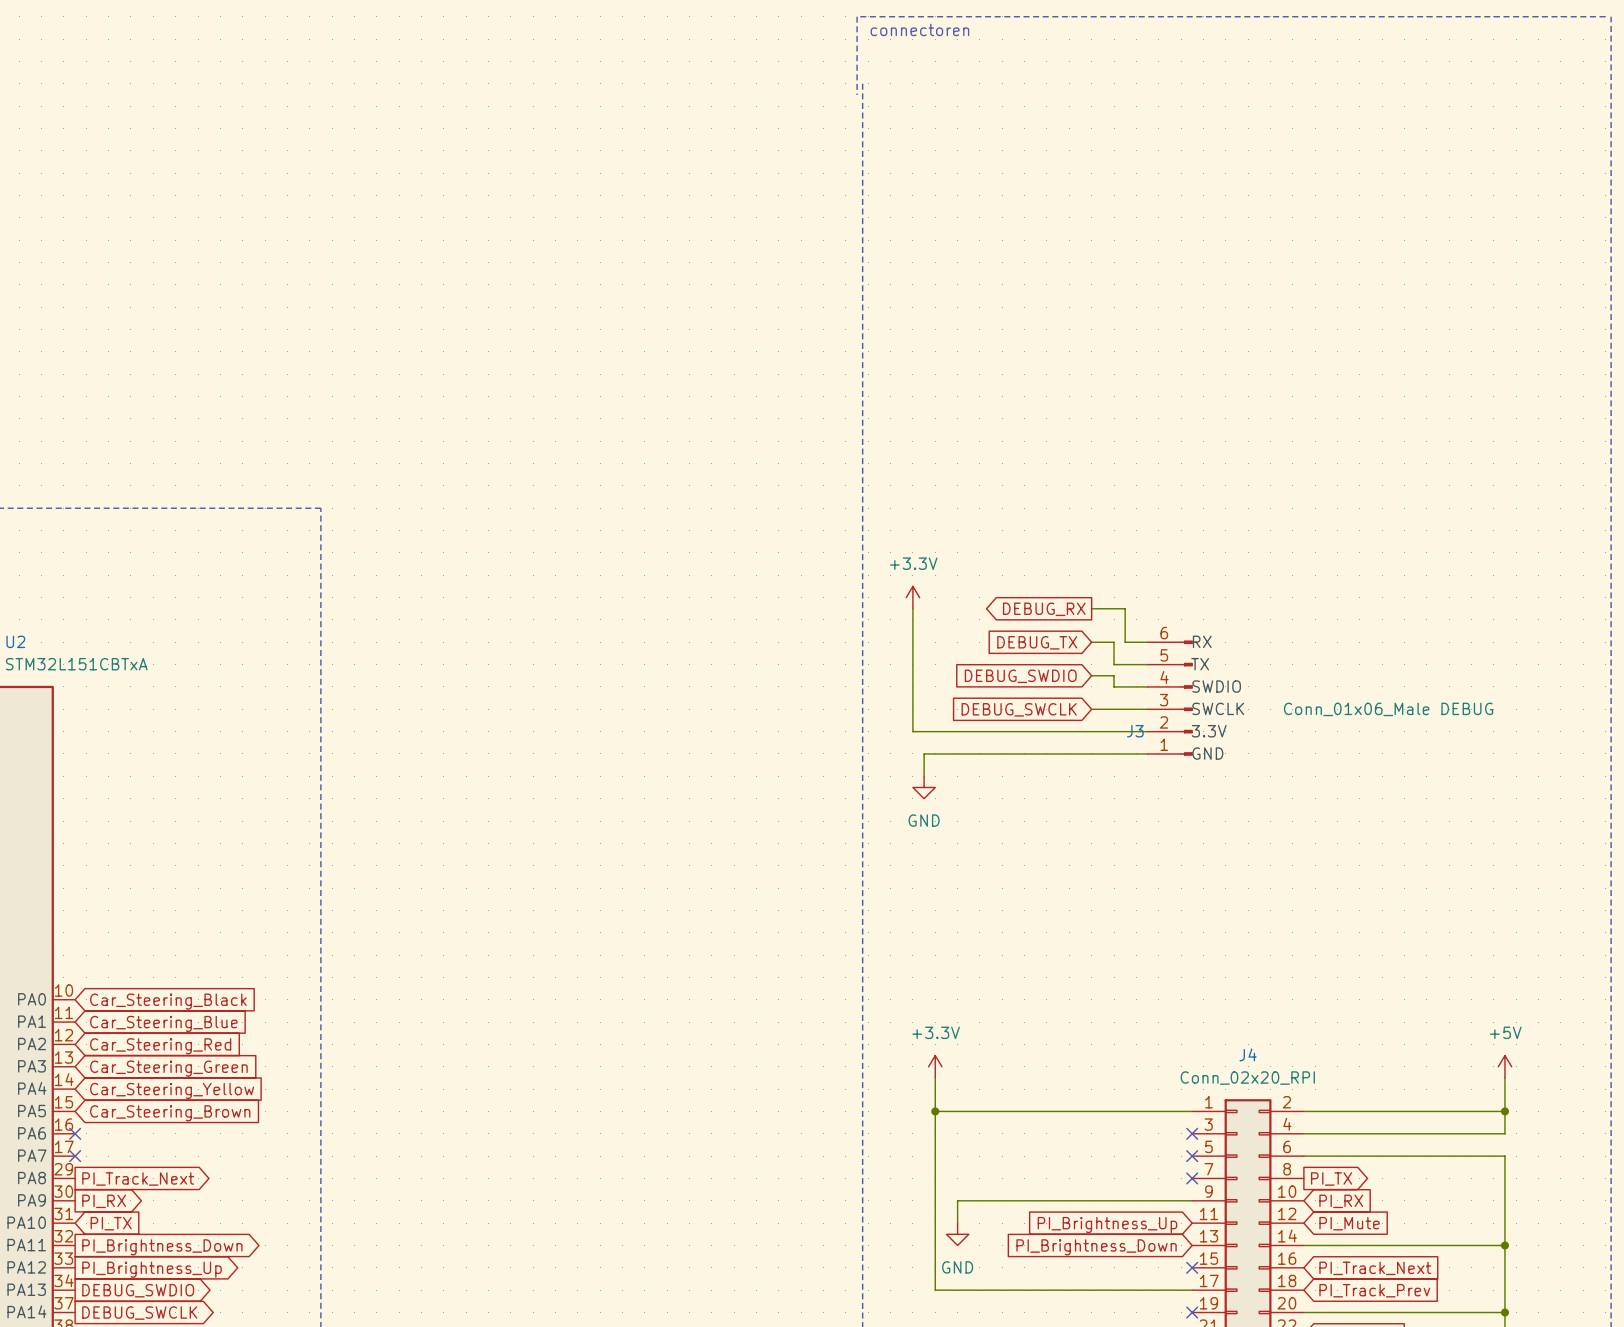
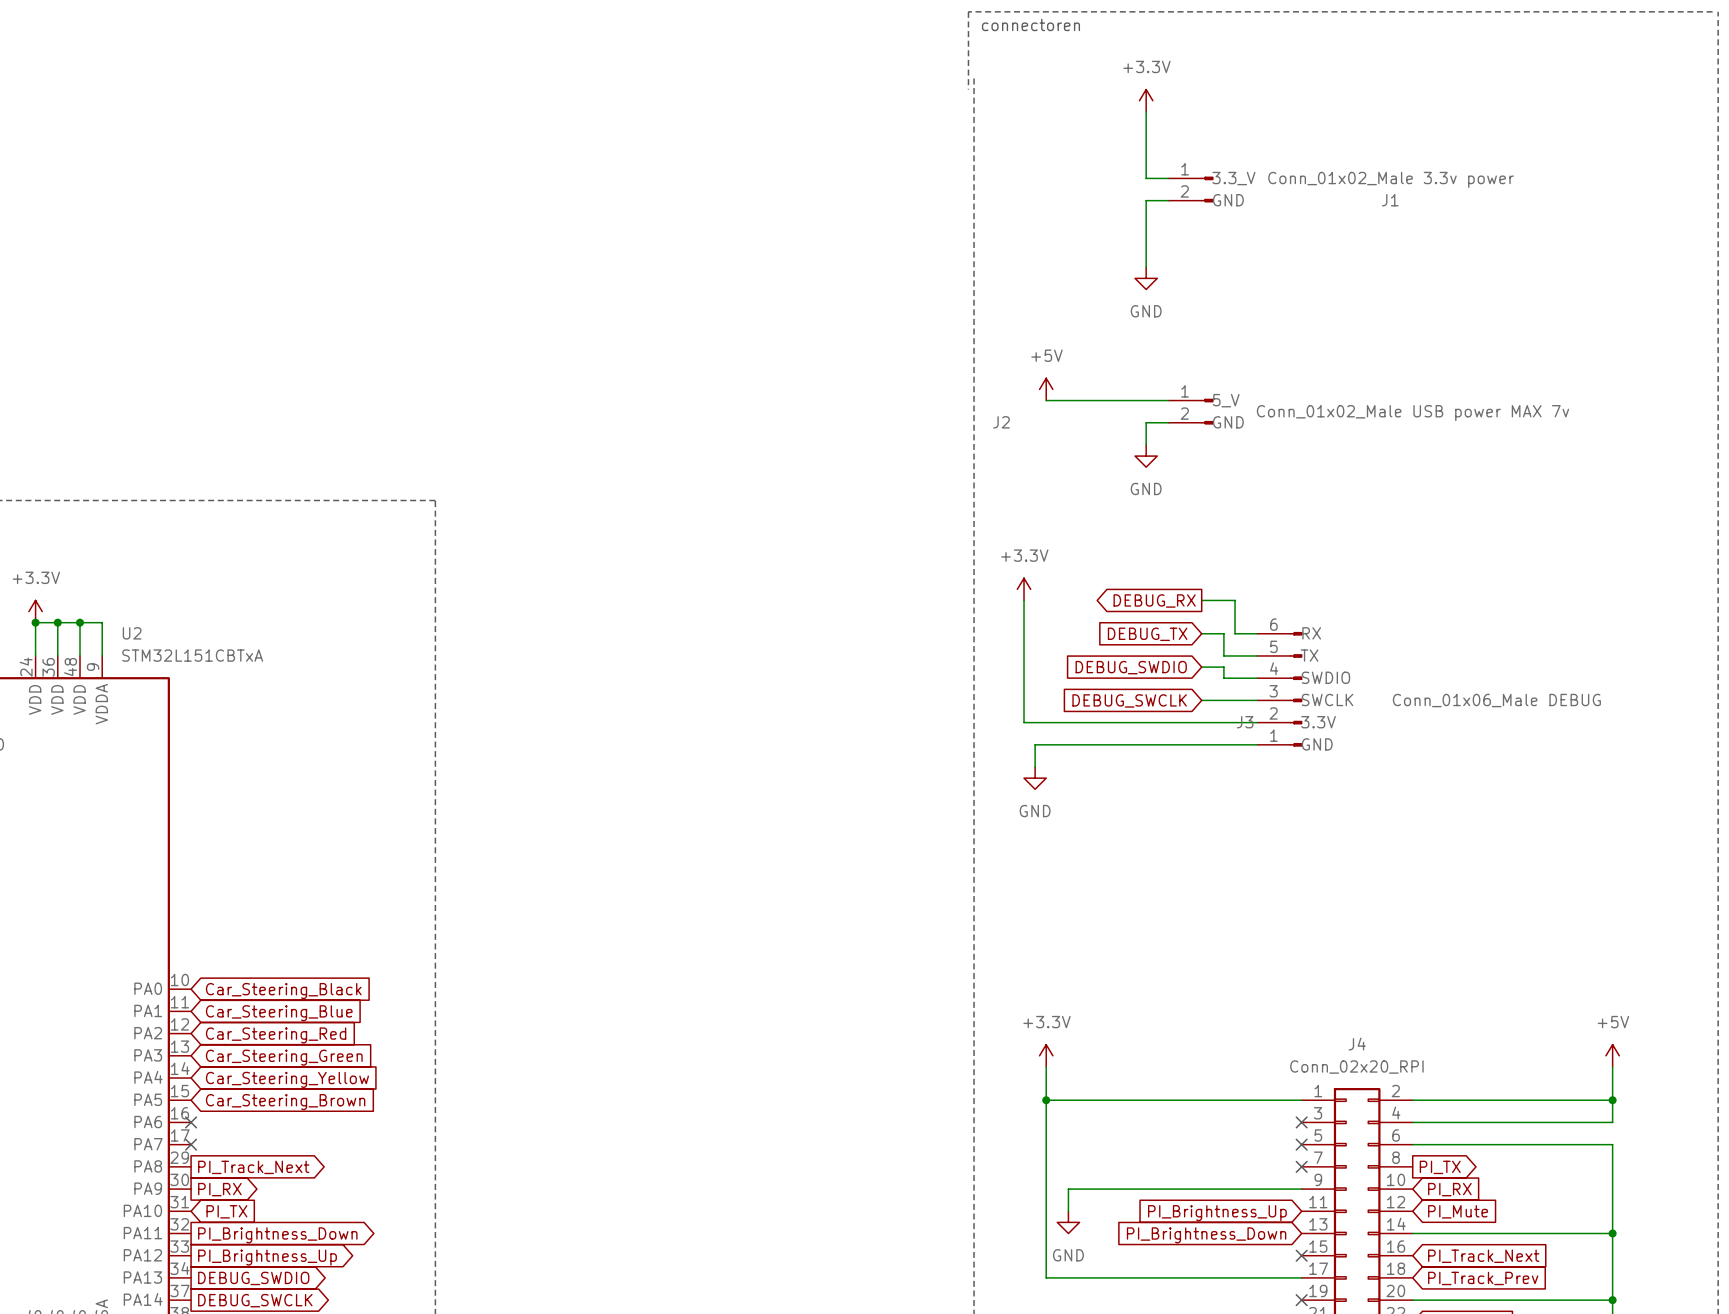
power symbol: none -> +3.3V (1146, 100)
wire: none -> (1146, 111) (1146, 178) (1168, 178)
J1: none -> Conn_01x02_Male 3.3v power (1190, 189)
wire: none -> (1168, 200) (1146, 200) (1146, 267)
power symbol: none -> GND (1146, 278)
power symbol: none -> +5V (1046, 389)
wire: none -> (1046, 400) (1168, 400)
J2: none -> Conn_01x02_Male USB power MAX 7v (1190, 411)
wire: none -> (1168, 422) (1146, 422) (1146, 444)
power symbol: none -> GND (1146, 456)

